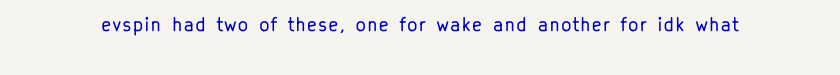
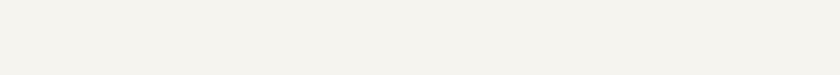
text: evspin had two of these, one for wake and another for idk what (420, 26) -> none

